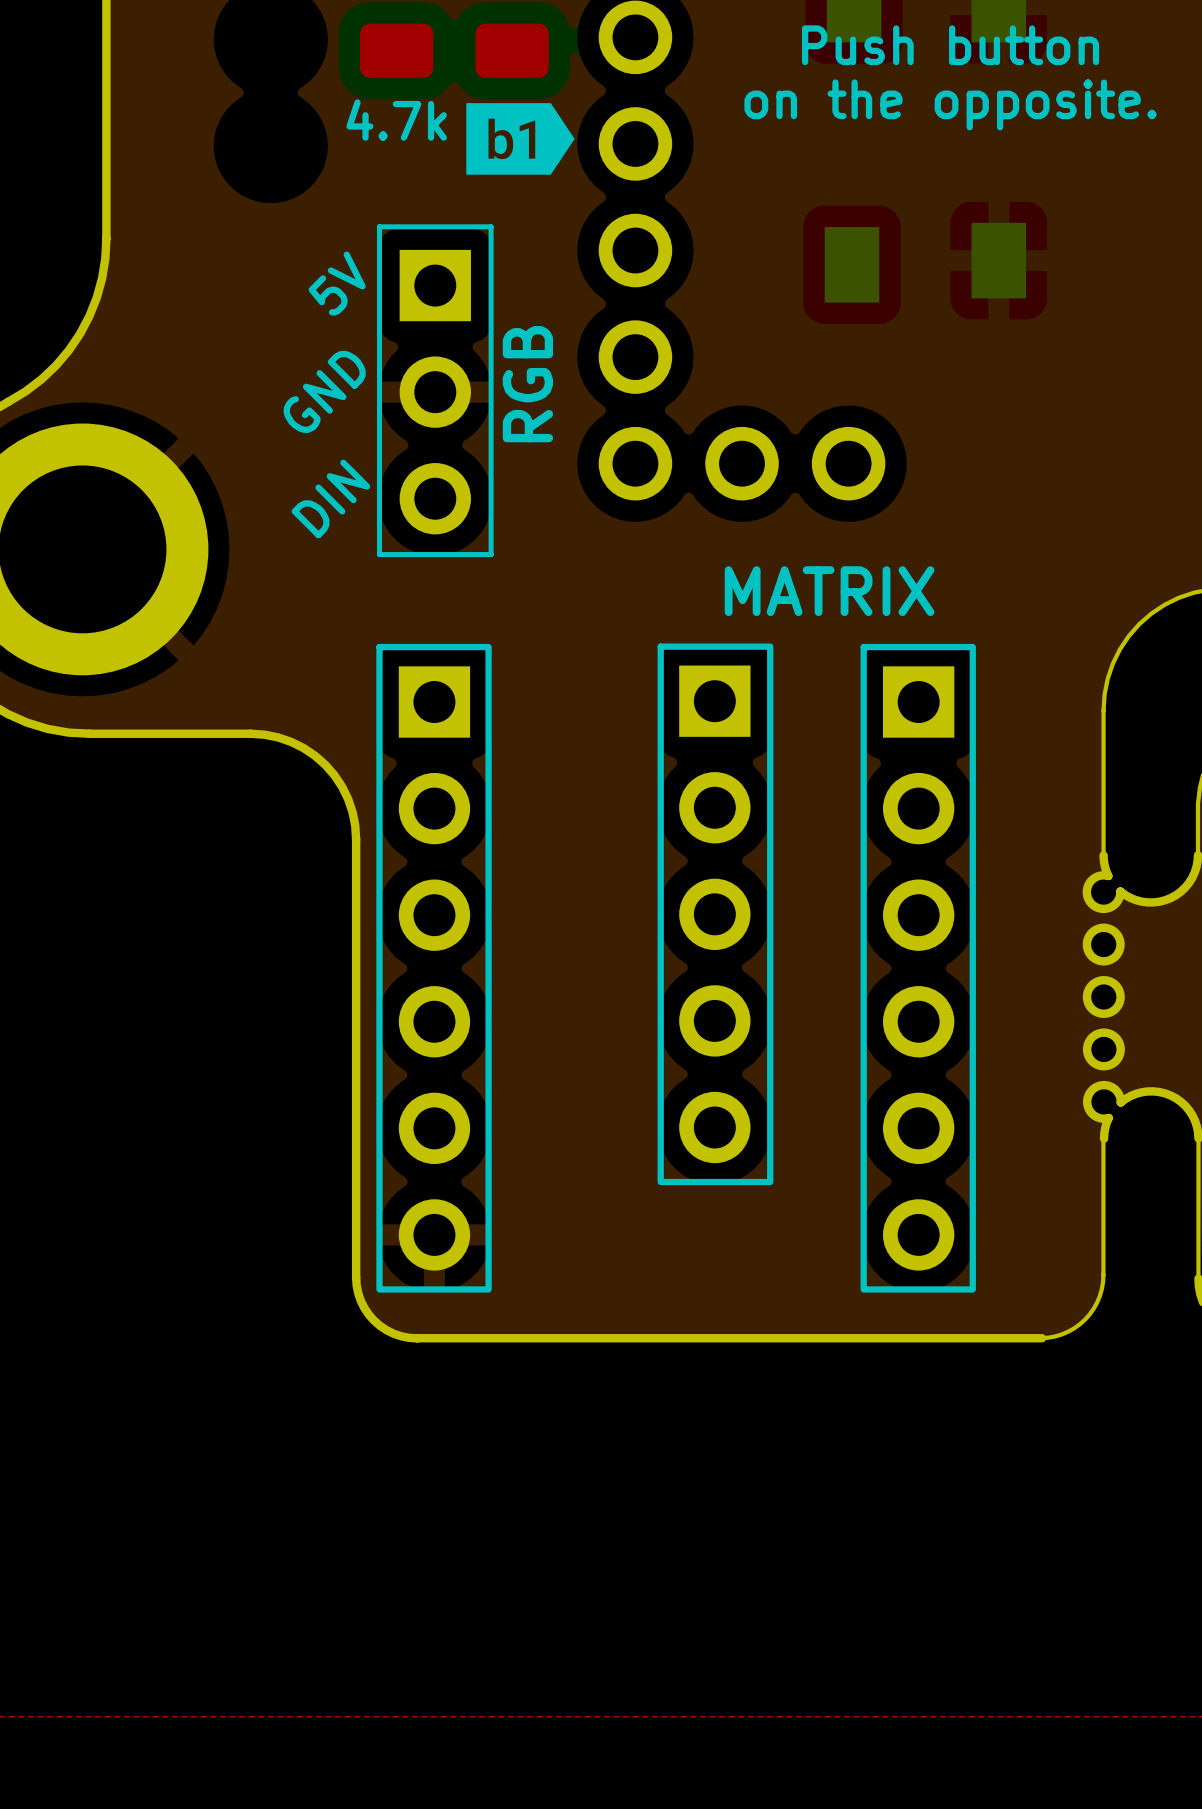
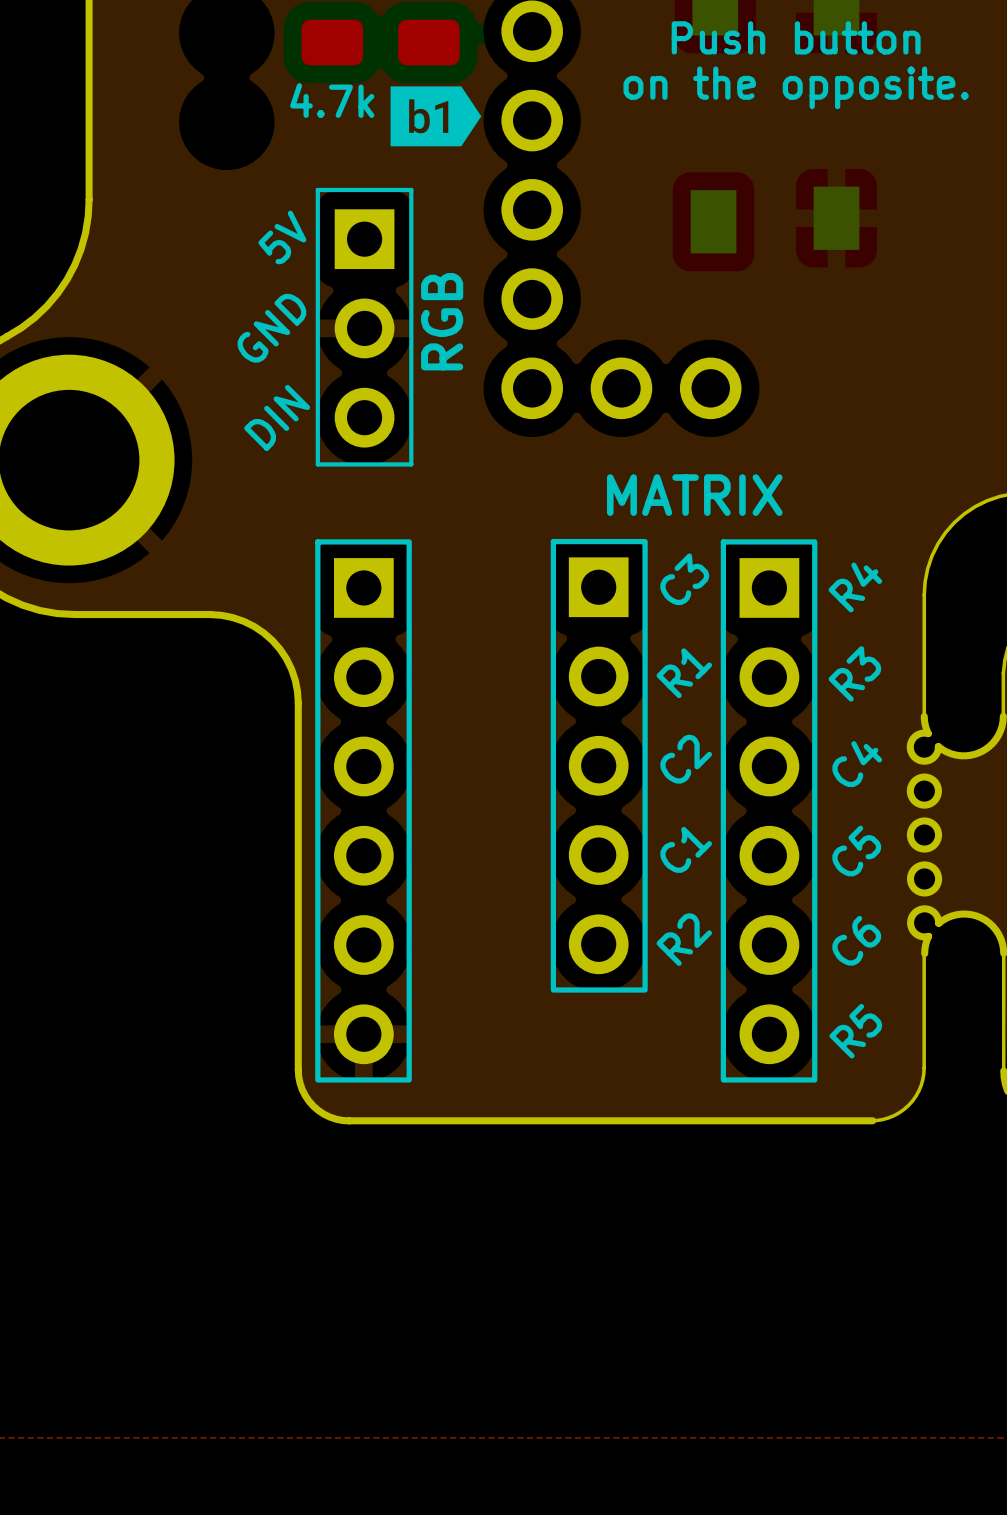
text: none -> C3 (684, 579)
text: none -> R4 (855, 587)
text: none -> R1 (684, 673)
text: none -> R3 (854, 673)
text: none -> C2 (686, 759)
text: none -> C4 (857, 764)
text: none -> C1 (686, 849)
text: none -> C5 (856, 851)
text: none -> R2 (684, 939)
text: none -> C6 (856, 940)
text: none -> R5 (855, 1031)

